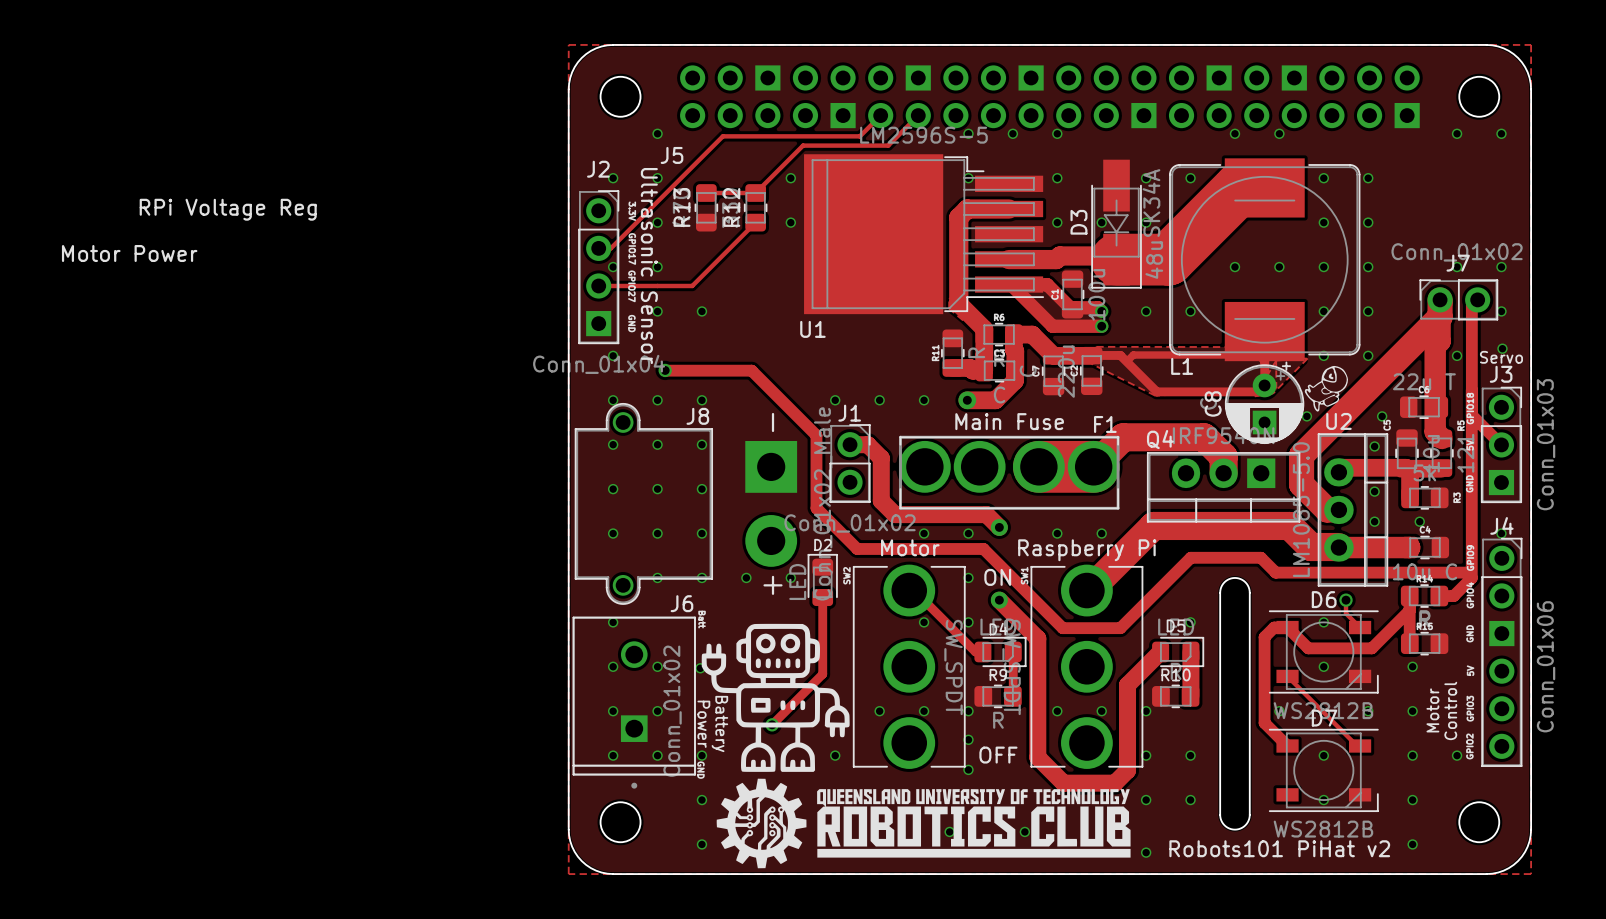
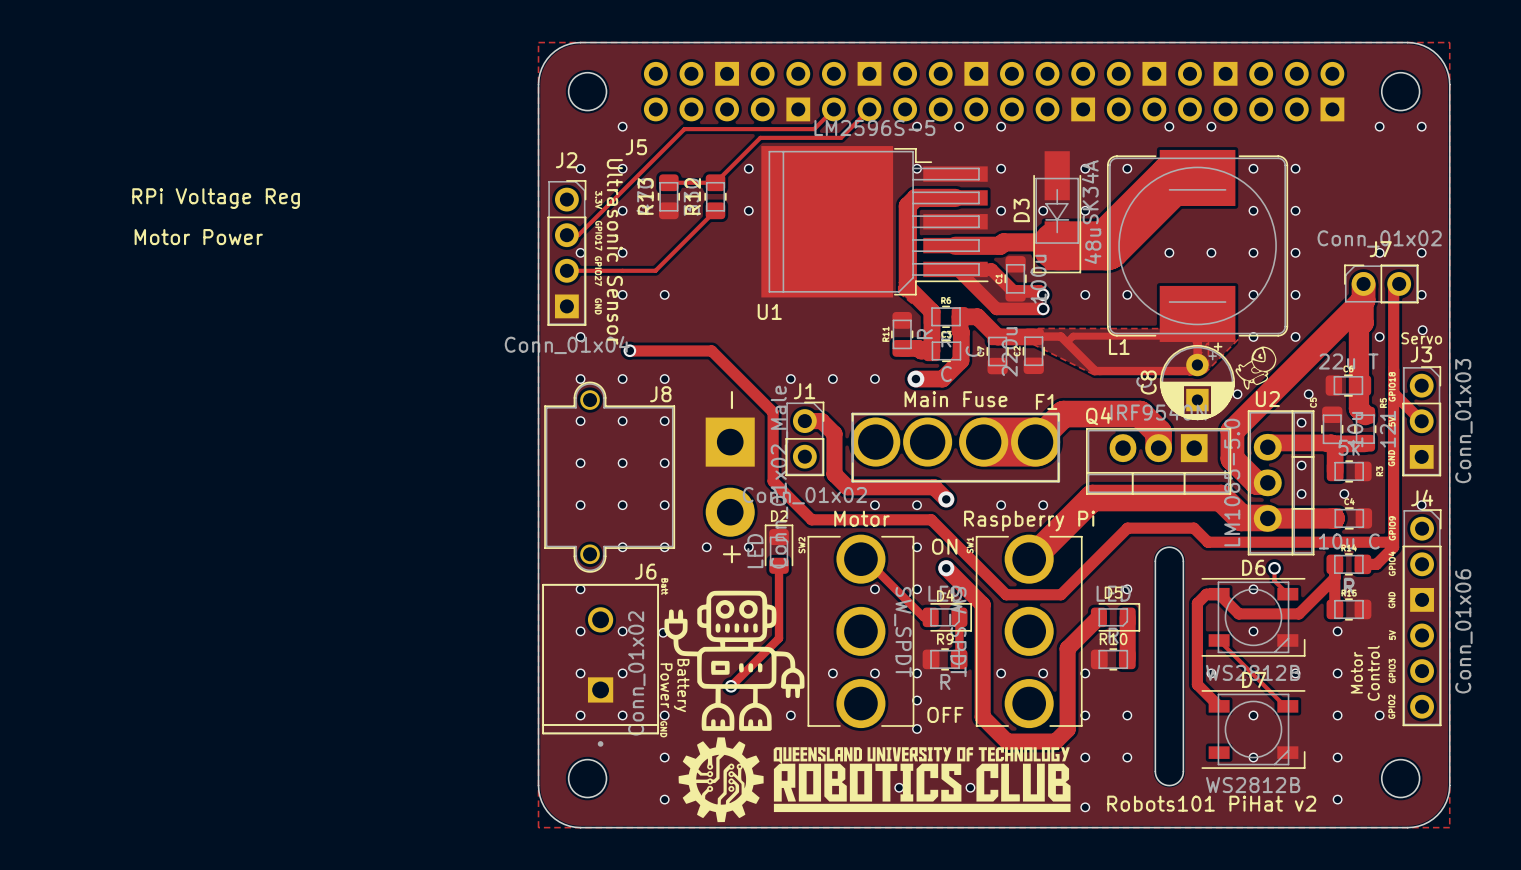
text position: Motor Power (129, 253) -> Motor Power (198, 237)

